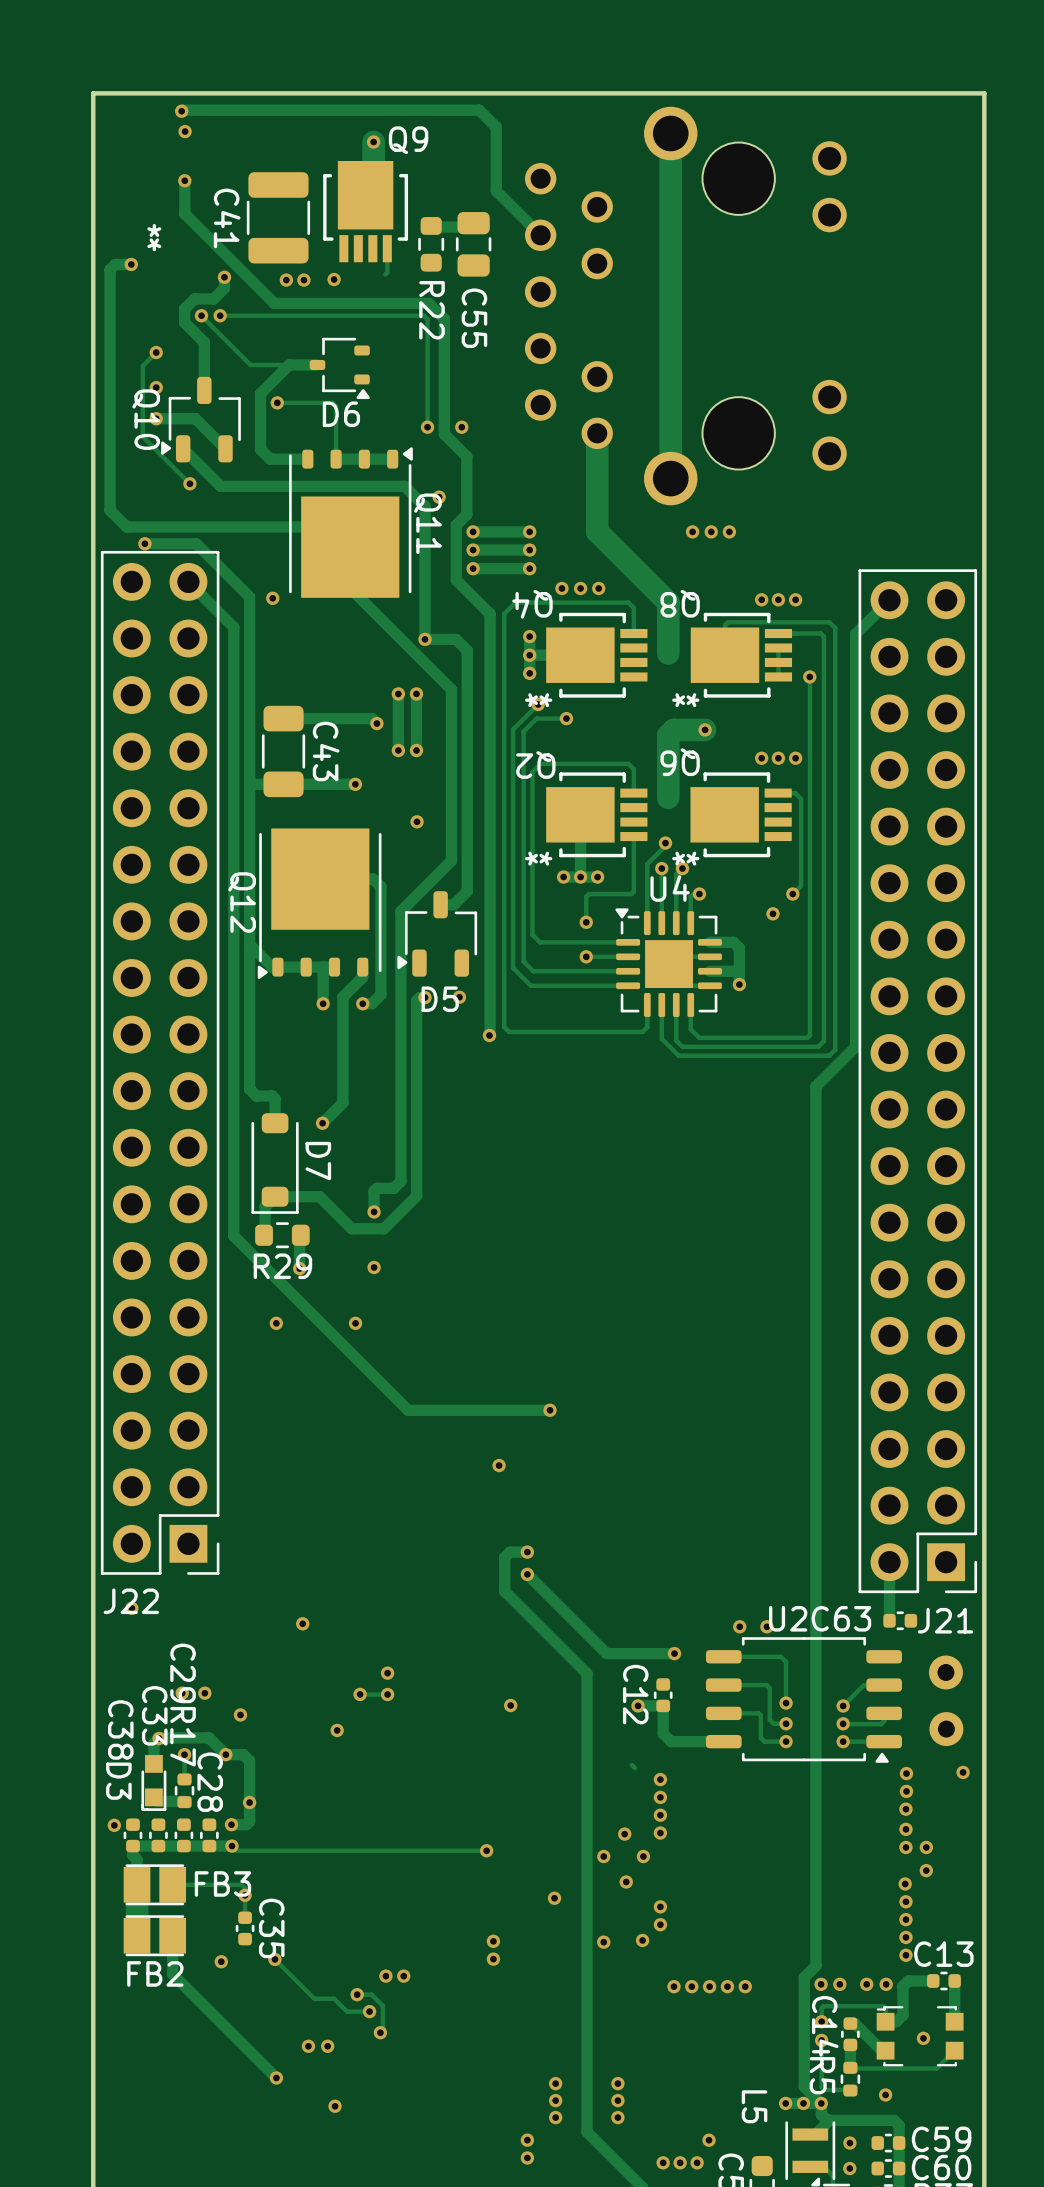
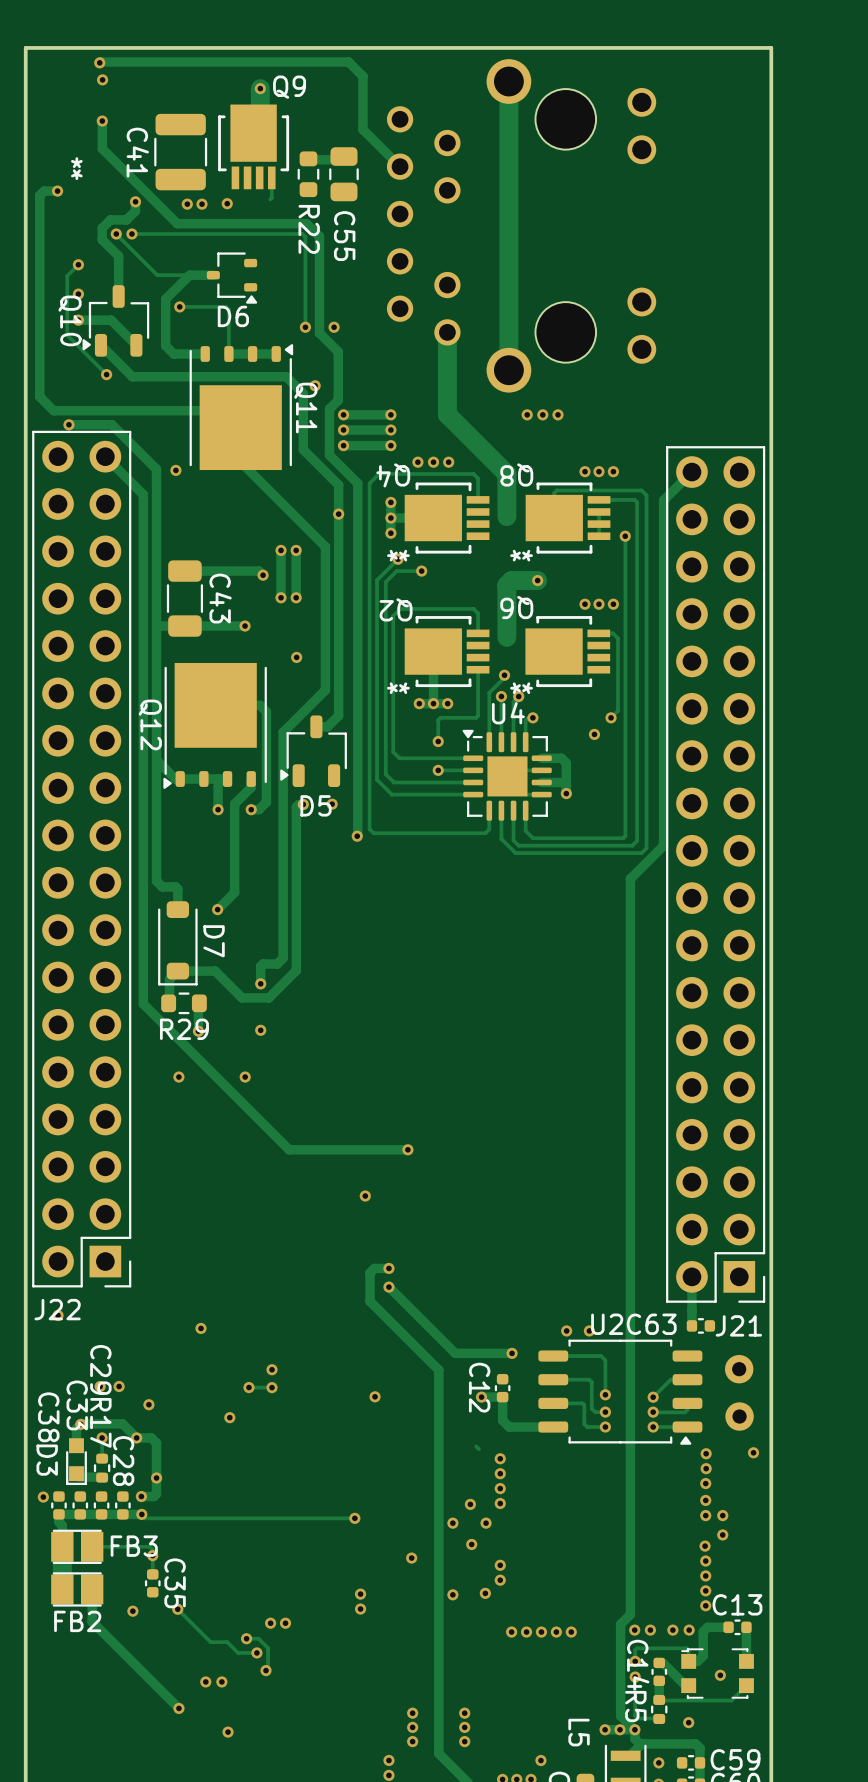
track: (425, 573) (425, 639) (456, 639) (467, 650) -> (303, 449) (338, 484) (338, 514)
via position: (425, 639) -> (338, 514)

